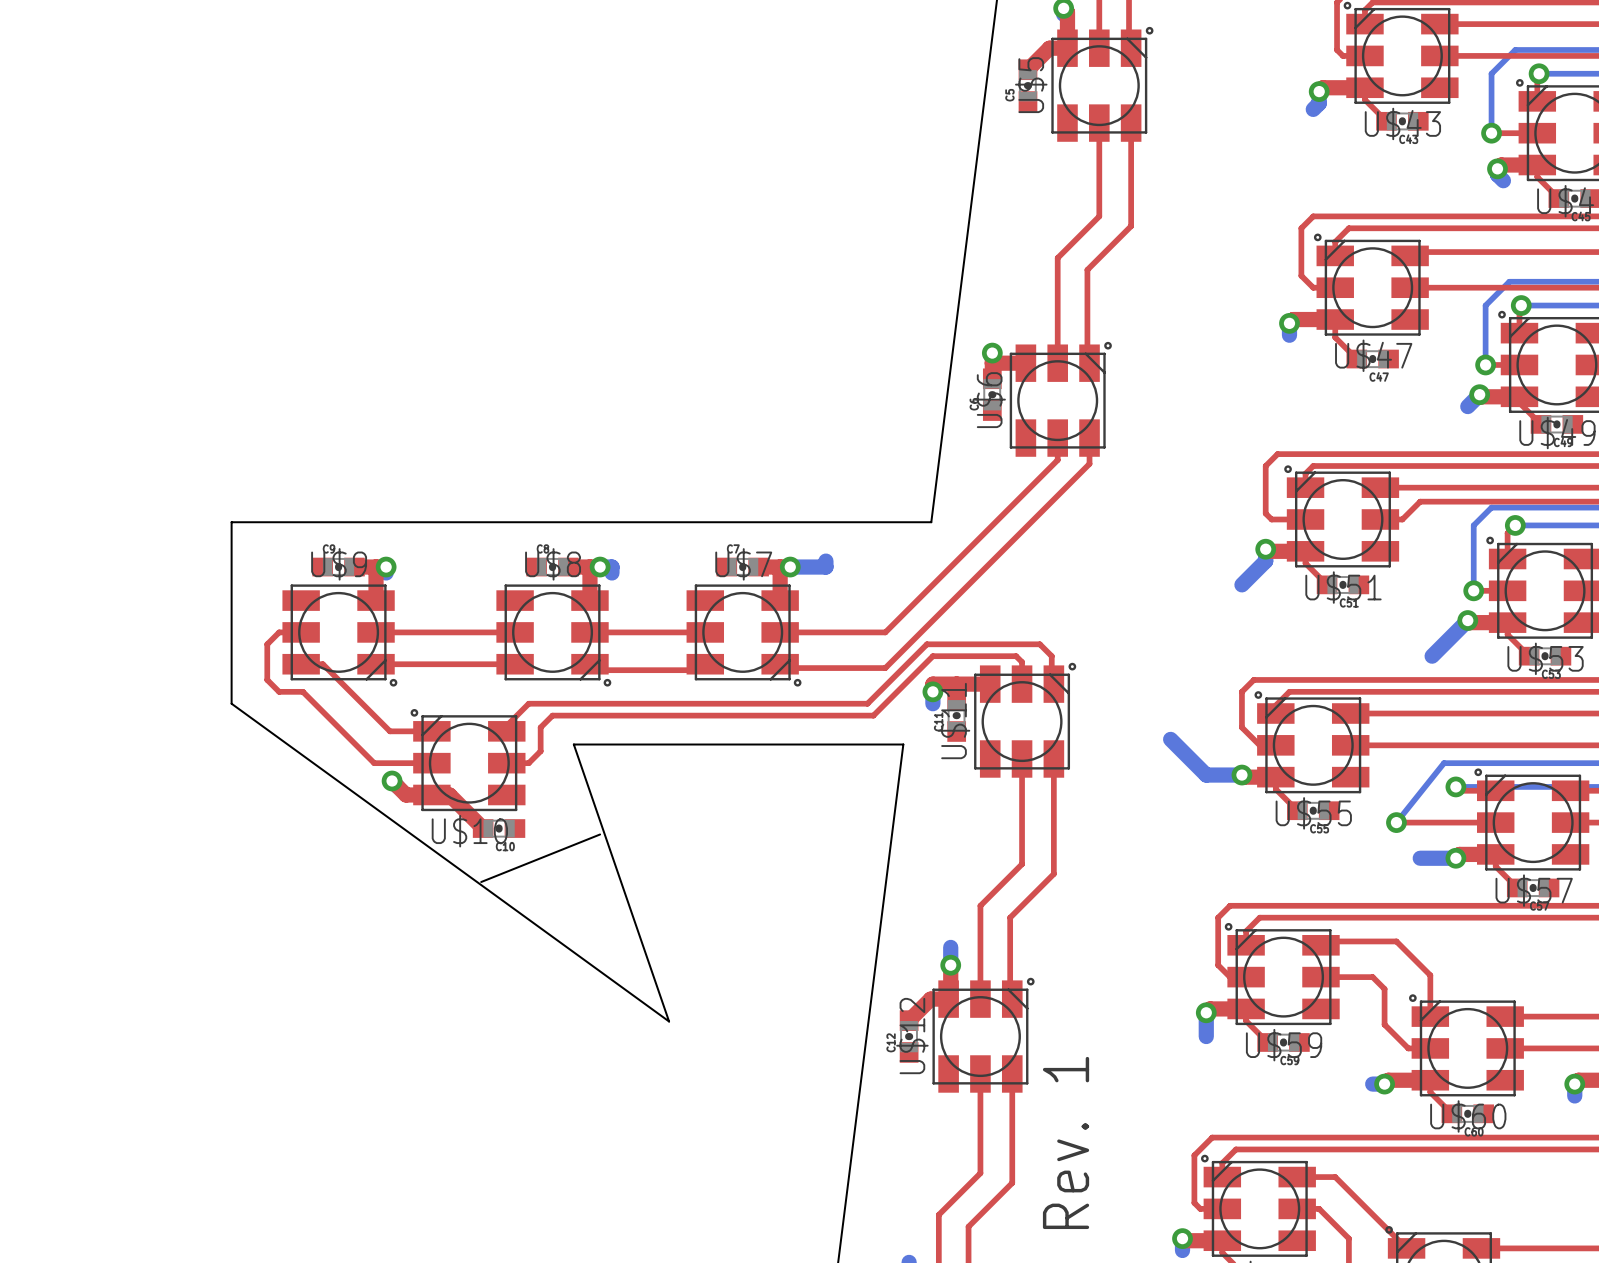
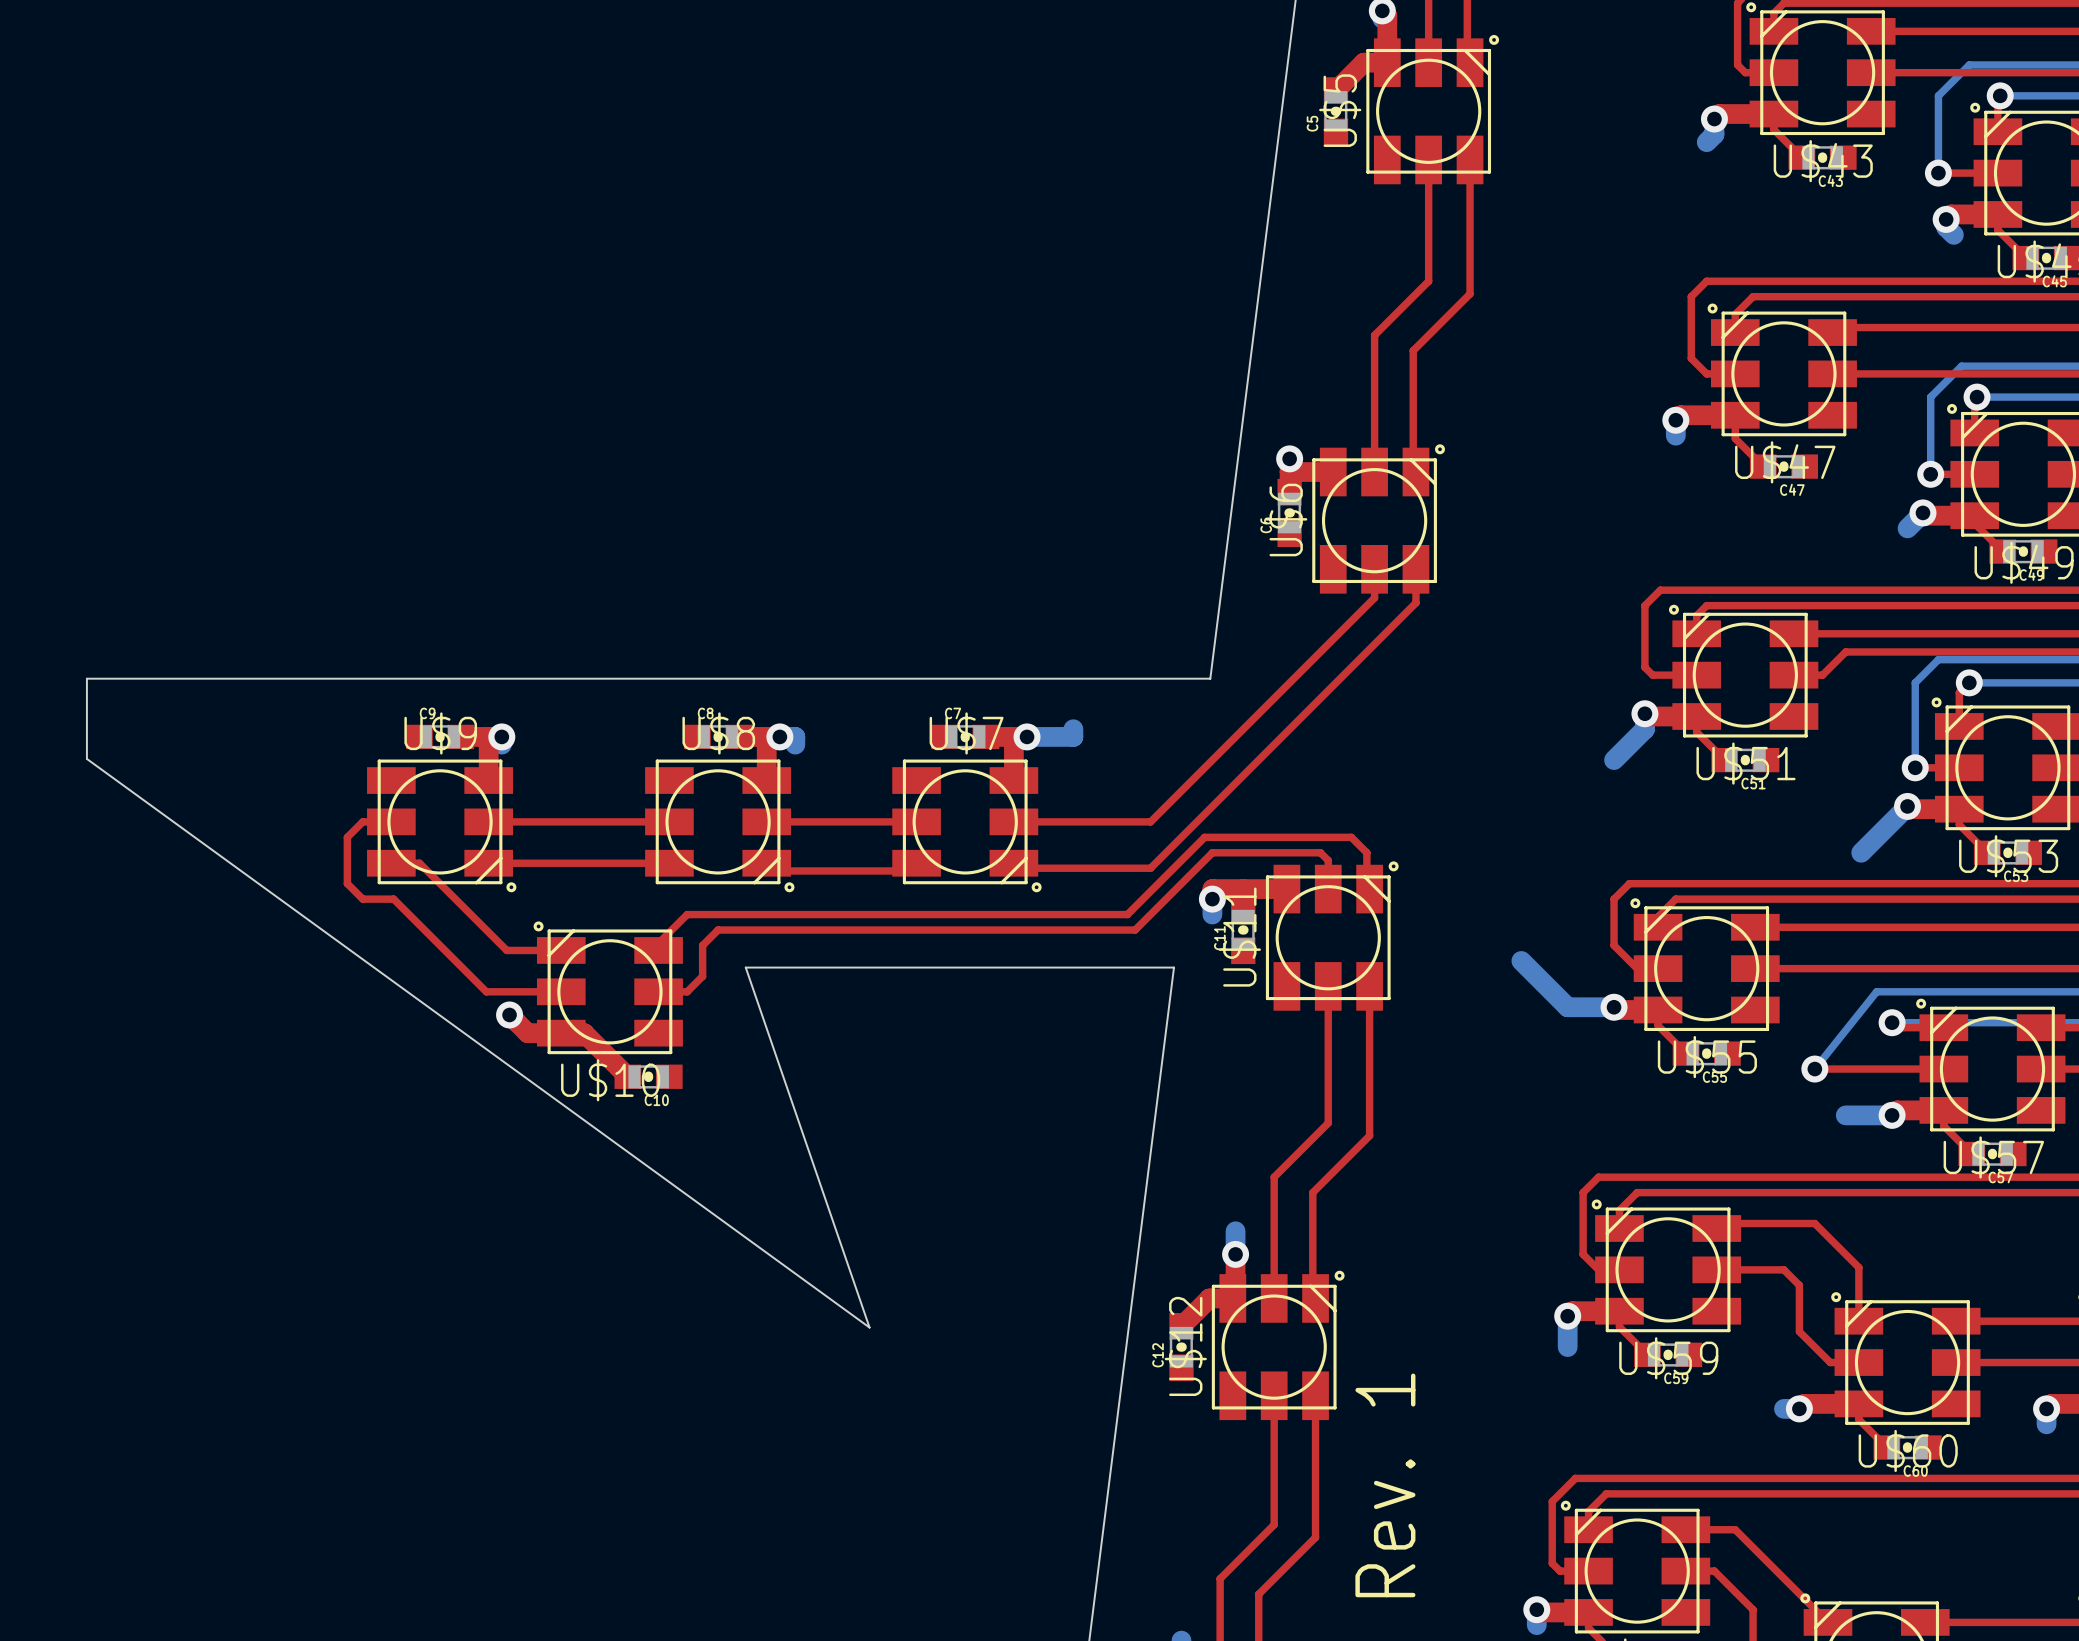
board edge: (231, 522) (231, 703) (669, 1021) -> (301, 678) (86, 678) (86, 758) (869, 1327)
board edge: (600, 834) (481, 882) -> none

